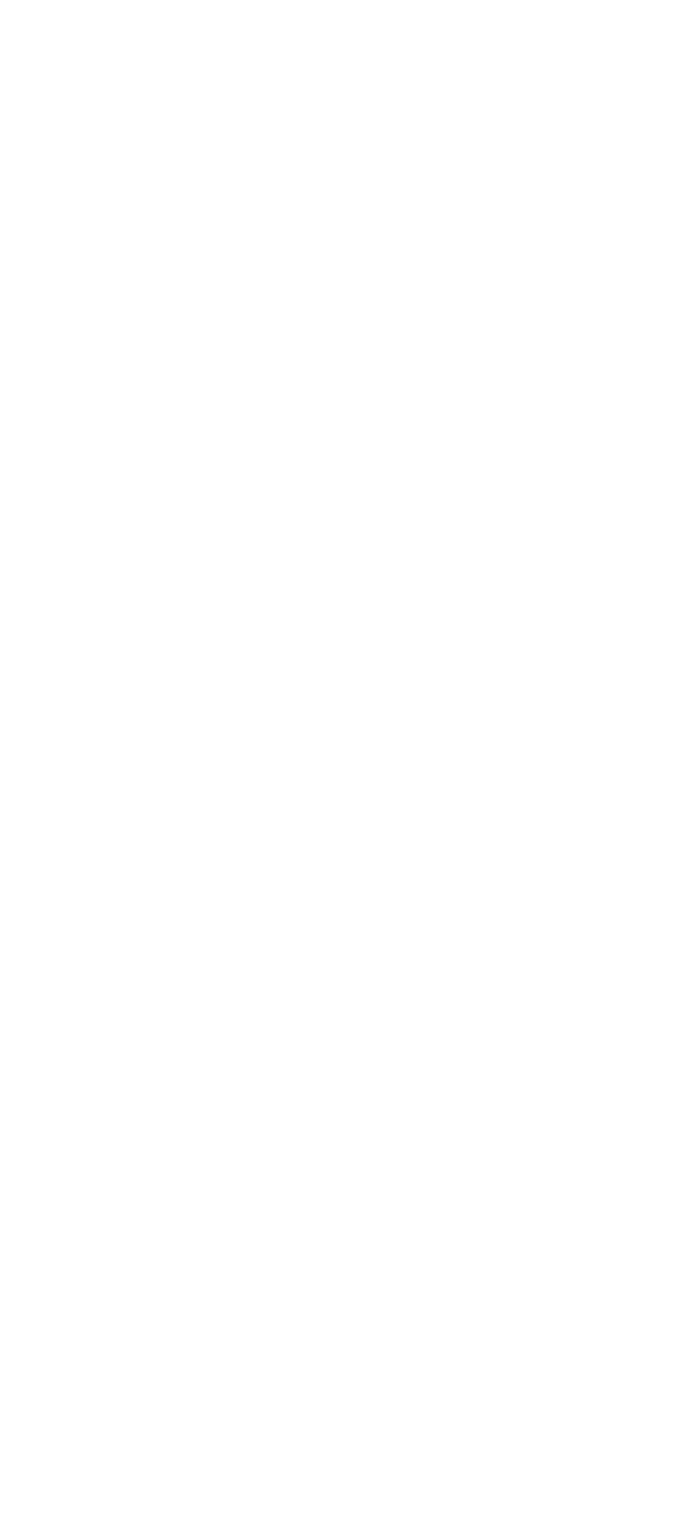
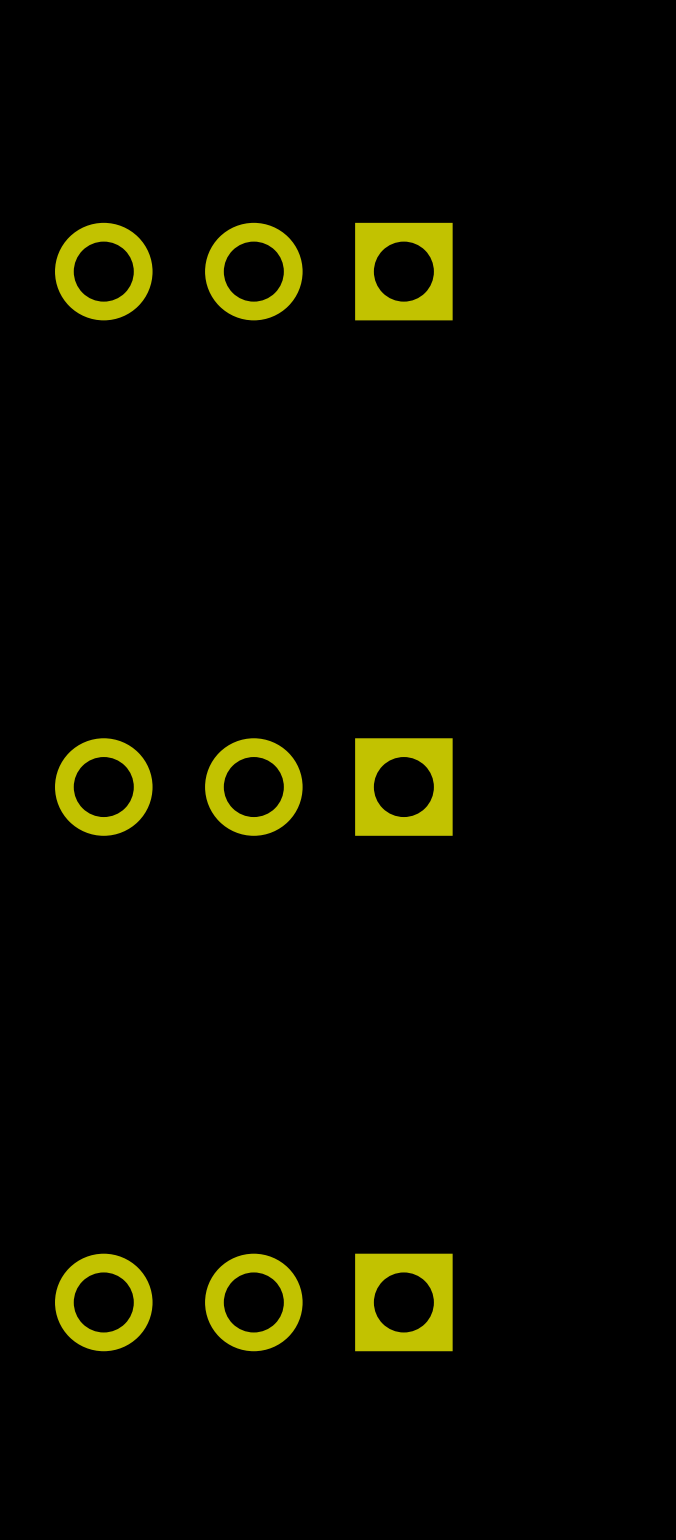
part: none -> (253, 271)
part: none -> (253, 787)
part: none -> (253, 1302)

